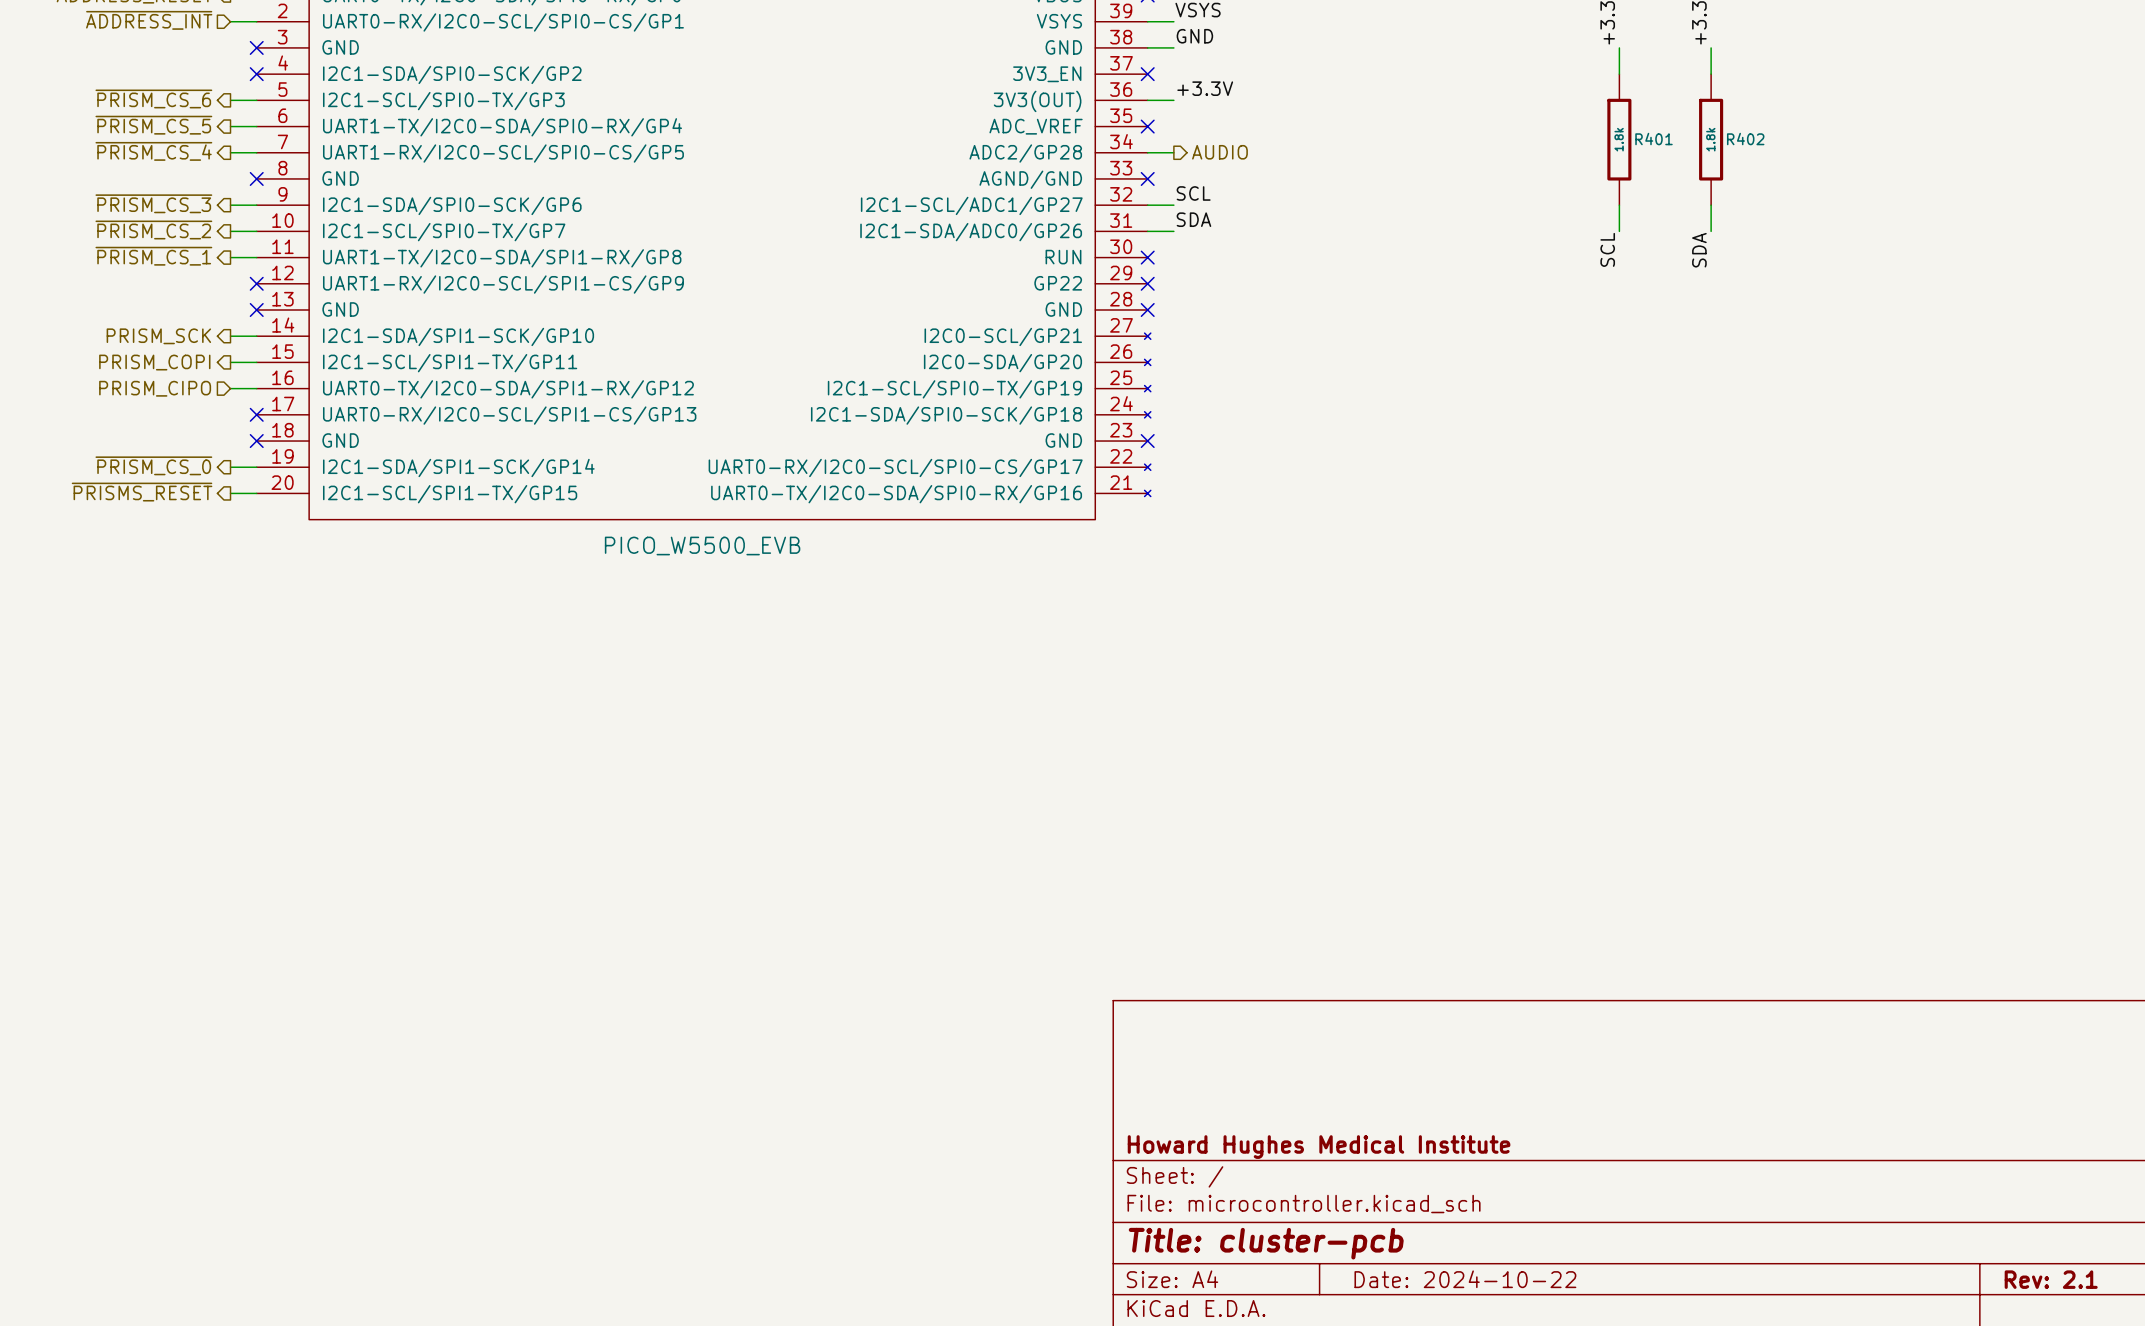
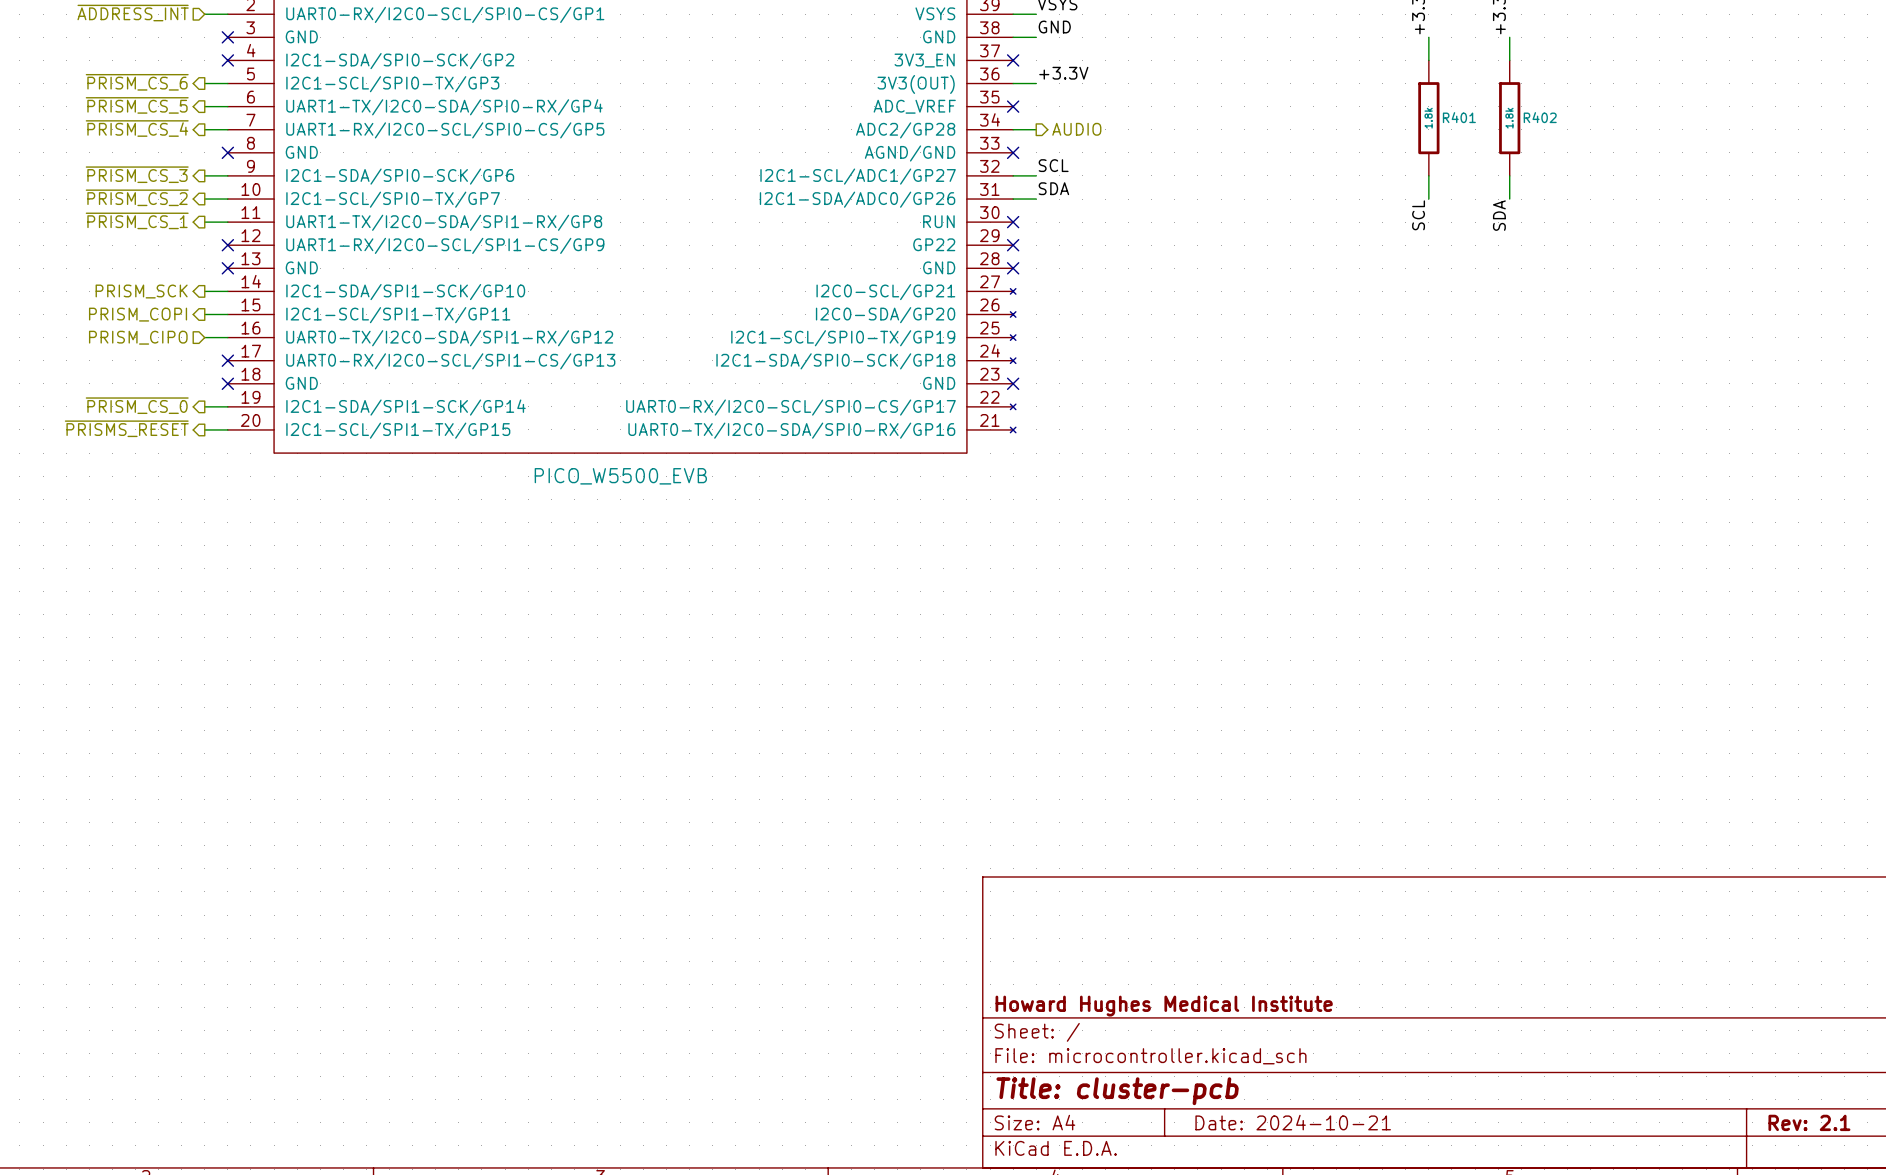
title block: Date: 2024-10-22 (1465, 1279) -> Date: 2024-10-21 (1293, 1122)

